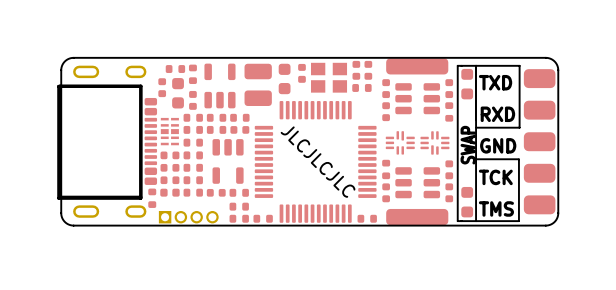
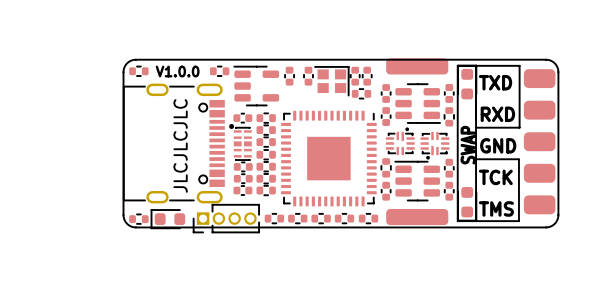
board edge: (73, 57) (549, 58) (556, 63) (558, 70) (557, 217) (552, 223) (545, 225) (69, 224) (63, 220) (61, 213) (61, 70) (64, 61) (73, 57) -> (135, 59) (127, 63) (123, 72) (123, 215) (125, 221) (131, 226) (545, 227) (553, 224) (557, 219) (558, 72) (555, 64) (550, 60) (135, 59)
part footprint: [352, 60, 361, 80] -> [349, 66, 361, 86]
part footprint: [364, 60, 373, 80] -> [361, 66, 373, 86]
part footprint: [311, 62, 348, 93] -> [314, 66, 350, 97]
part footprint: [244, 63, 272, 106] -> [233, 65, 280, 107]
part footprint: [278, 63, 291, 95] -> [284, 66, 295, 86]
part footprint: [461, 68, 474, 100] -> [457, 64, 478, 100]
part: (175, 69) -> none
part: none -> (138, 71)
text: none -> V1.0.0 (177, 71)
part: none -> (219, 71)
part: (301, 73) -> none
part: (192, 74) -> none
part: none -> (308, 76)
part footprint: [382, 79, 390, 99] -> [380, 84, 392, 103]
part footprint: [445, 79, 454, 99] -> [444, 84, 455, 103]
part footprint: [395, 83, 441, 115] -> [395, 83, 441, 124]
part footprint: [352, 84, 372, 92] -> [351, 88, 372, 100]
part: (219, 85) -> none
part: (162, 87) -> none
part: (178, 93) -> none
part: (192, 100) -> none
part footprint: [382, 102, 390, 122] -> [380, 107, 392, 127]
part footprint: [445, 102, 454, 122] -> [443, 107, 455, 127]
part footprint: [230, 113, 250, 122] -> [233, 112, 253, 124]
part: (193, 117) -> none
part: (216, 117) -> none
part: none -> (266, 118)
part: (193, 129) -> none
part: (216, 129) -> none
part: (239, 129) -> none
part: none -> (266, 130)
part: (169, 131) -> none
part footprint: [385, 131, 415, 155] -> [385, 127, 415, 156]
part footprint: [420, 131, 450, 155] -> [420, 131, 450, 160]
part: (107, 141) -> none
part: (193, 142) -> none
part: none -> (240, 142)
part: none -> (266, 142)
part: none -> (173, 143)
part: none -> (266, 154)
part: (169, 155) -> none
part: (193, 155) -> none
part: none -> (328, 158)
part footprint: [382, 159, 391, 180] -> [380, 158, 392, 178]
part footprint: [445, 160, 454, 180] -> [444, 158, 455, 178]
part: (228, 161) -> none
part: (315, 161) -> none
text rotation: 0° (318, 162) -> 135° counterclockwise (180, 145)
text position: JLCJLCJLC (318, 162) -> JLCJLCJLC (180, 145)
part: none -> (243, 166)
part: none -> (266, 166)
part: (169, 167) -> none
part: (193, 167) -> none
part footprint: [395, 167, 441, 199] -> [394, 160, 441, 202]
part: none -> (243, 178)
part: none -> (266, 178)
part: (169, 180) -> none
part: (193, 180) -> none
part footprint: [382, 183, 390, 203] -> [380, 181, 392, 201]
part footprint: [445, 183, 454, 203] -> [444, 181, 455, 201]
part footprint: [461, 186, 474, 218] -> [457, 186, 478, 222]
part footprint: [229, 188, 249, 197] -> [233, 185, 253, 196]
part: none -> (266, 190)
part: (169, 192) -> none
part: (193, 192) -> none
part: (216, 192) -> none
part: (152, 198) -> none
part: (239, 206) -> none
part footprint: [253, 214, 273, 223] -> [264, 213, 285, 225]
part footprint: [357, 214, 377, 223] -> [358, 213, 379, 225]
part: (188, 217) -> none
part: none -> (226, 218)
part: (239, 218) -> none
part: none -> (297, 218)
part: none -> (321, 218)
part: none -> (344, 218)
part: none -> (138, 219)
part: none -> (167, 219)

